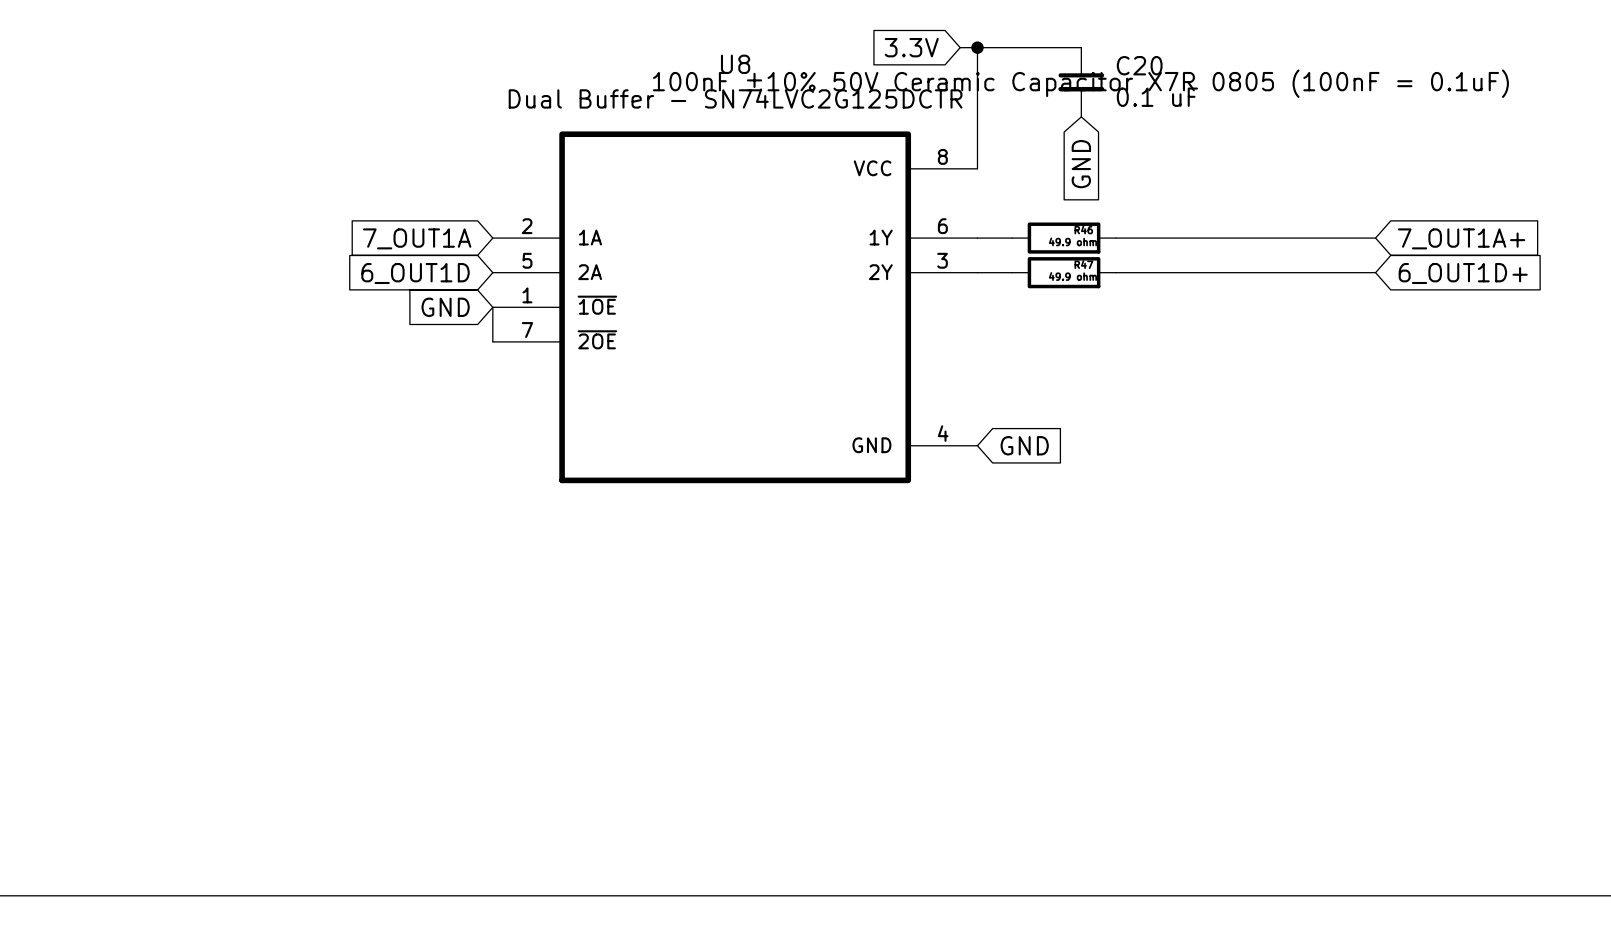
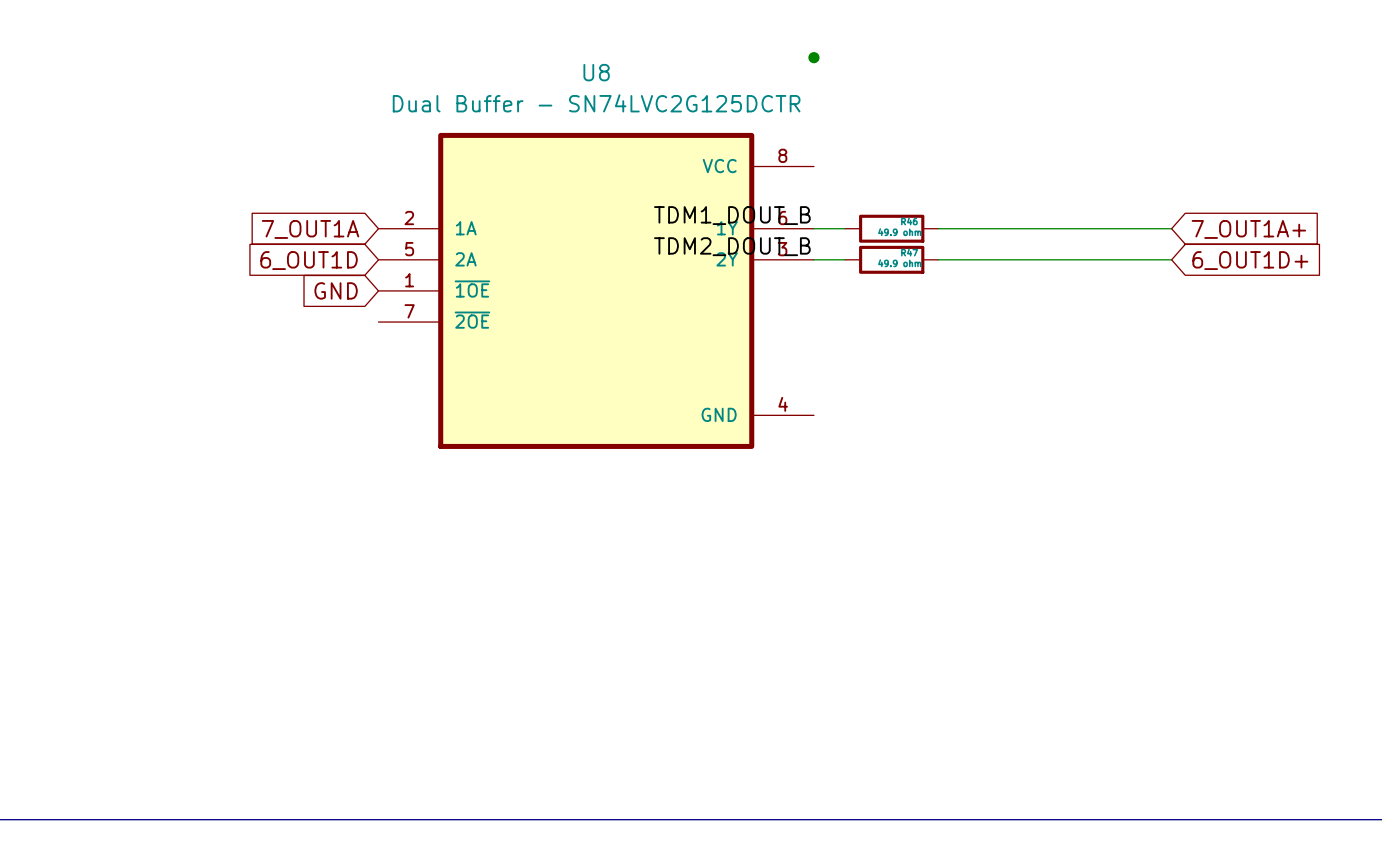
global label: 3.3V (911, 47) -> none
wire: (960, 47) (1081, 47) -> none
wire: (977, 47) (977, 168) -> none
C20: 0.1 uF (1081, 82) -> none
global label: GND (1081, 164) -> none
label: none -> TDM1_DOUT_B (732, 215)
label: none -> TDM2_DOUT_B (732, 246)
wire: (492, 307) (492, 341) -> none
global label: GND (1024, 445) -> none

